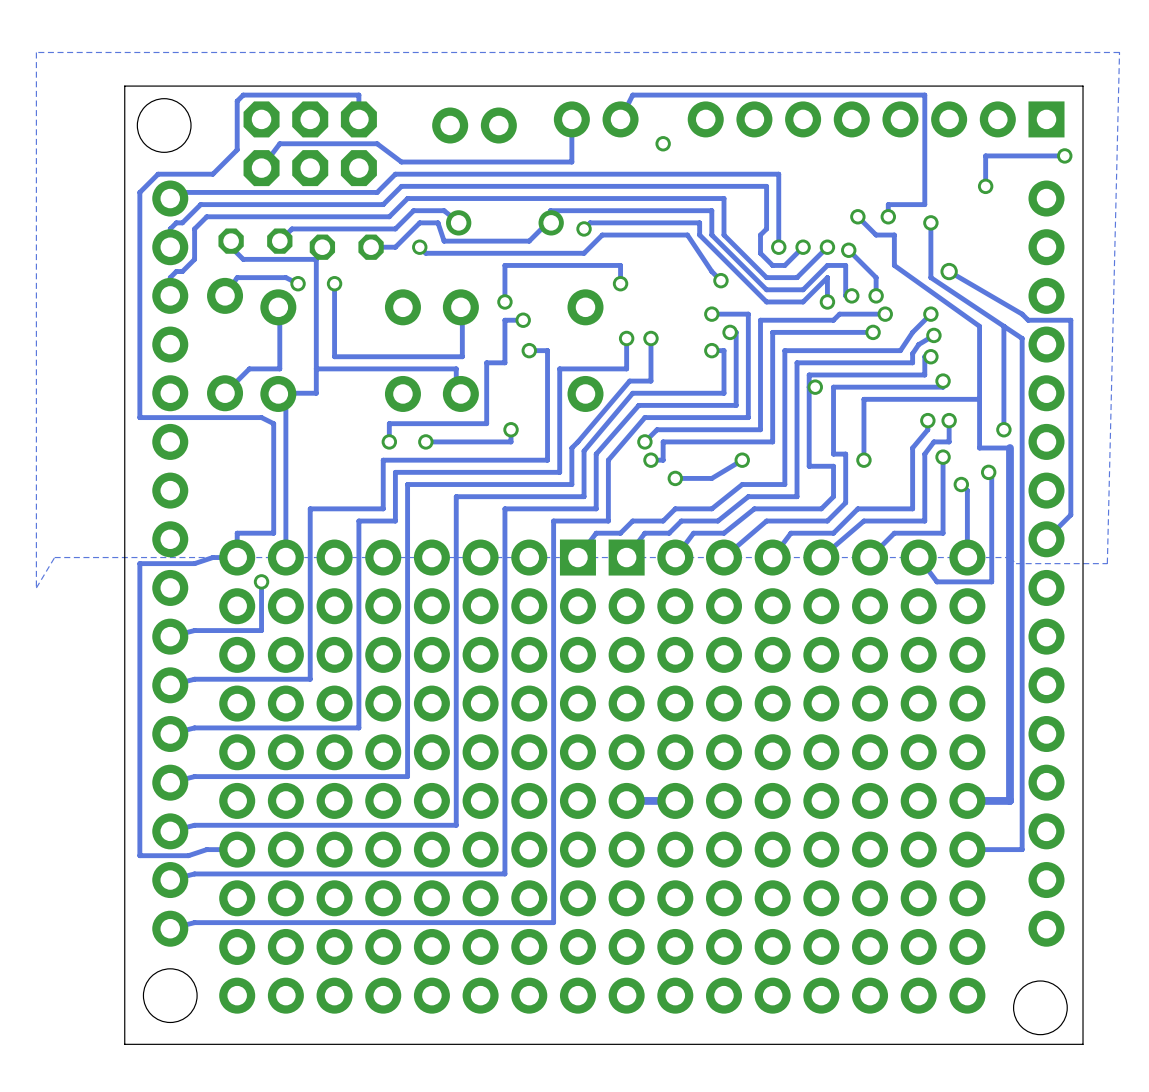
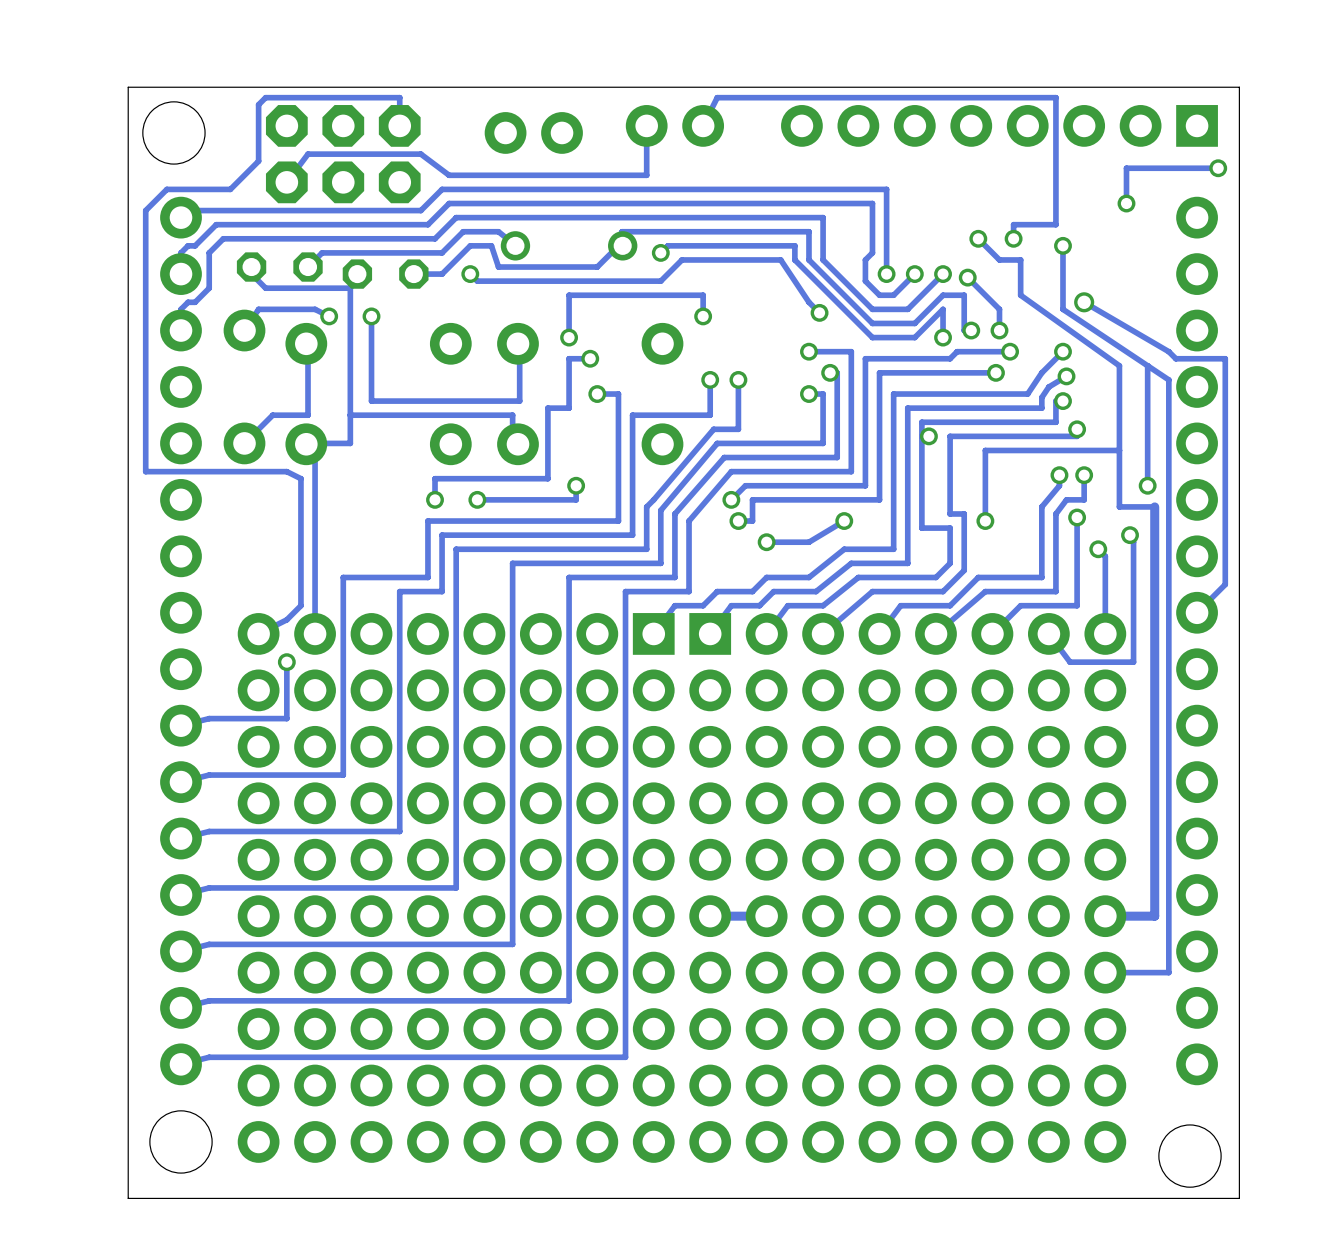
zone outline: (1119, 52) (36, 52) (36, 587) (54, 557) (1009, 557) (1016, 563) (1107, 563) (1119, 52) -> none
via: (663, 143) -> none
track: (273, 533) (237, 533) (237, 557) (212, 557) (194, 563) (139, 563) (139, 855) (188, 855) (206, 849) (237, 849) -> (300, 605) (286, 619) (258, 633)

